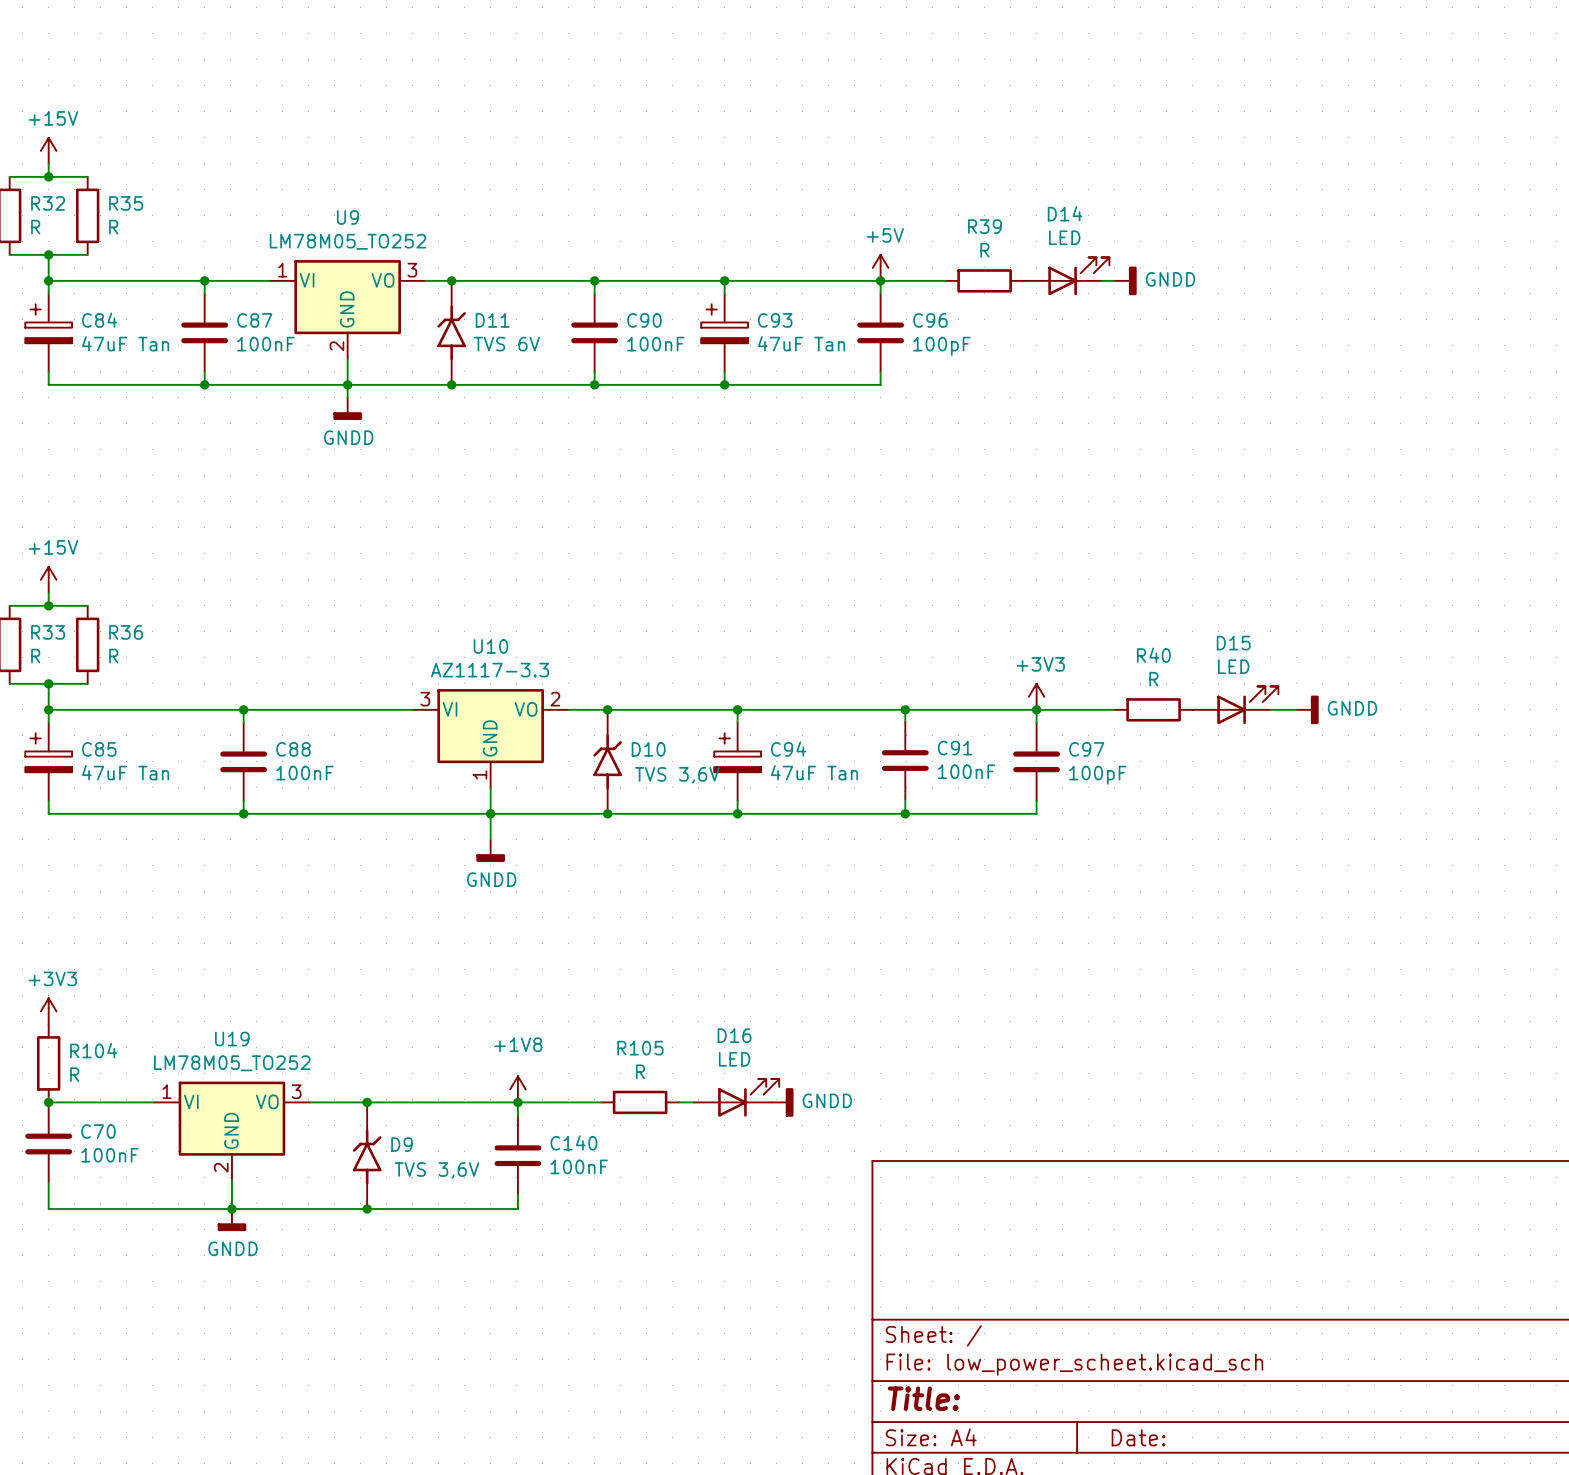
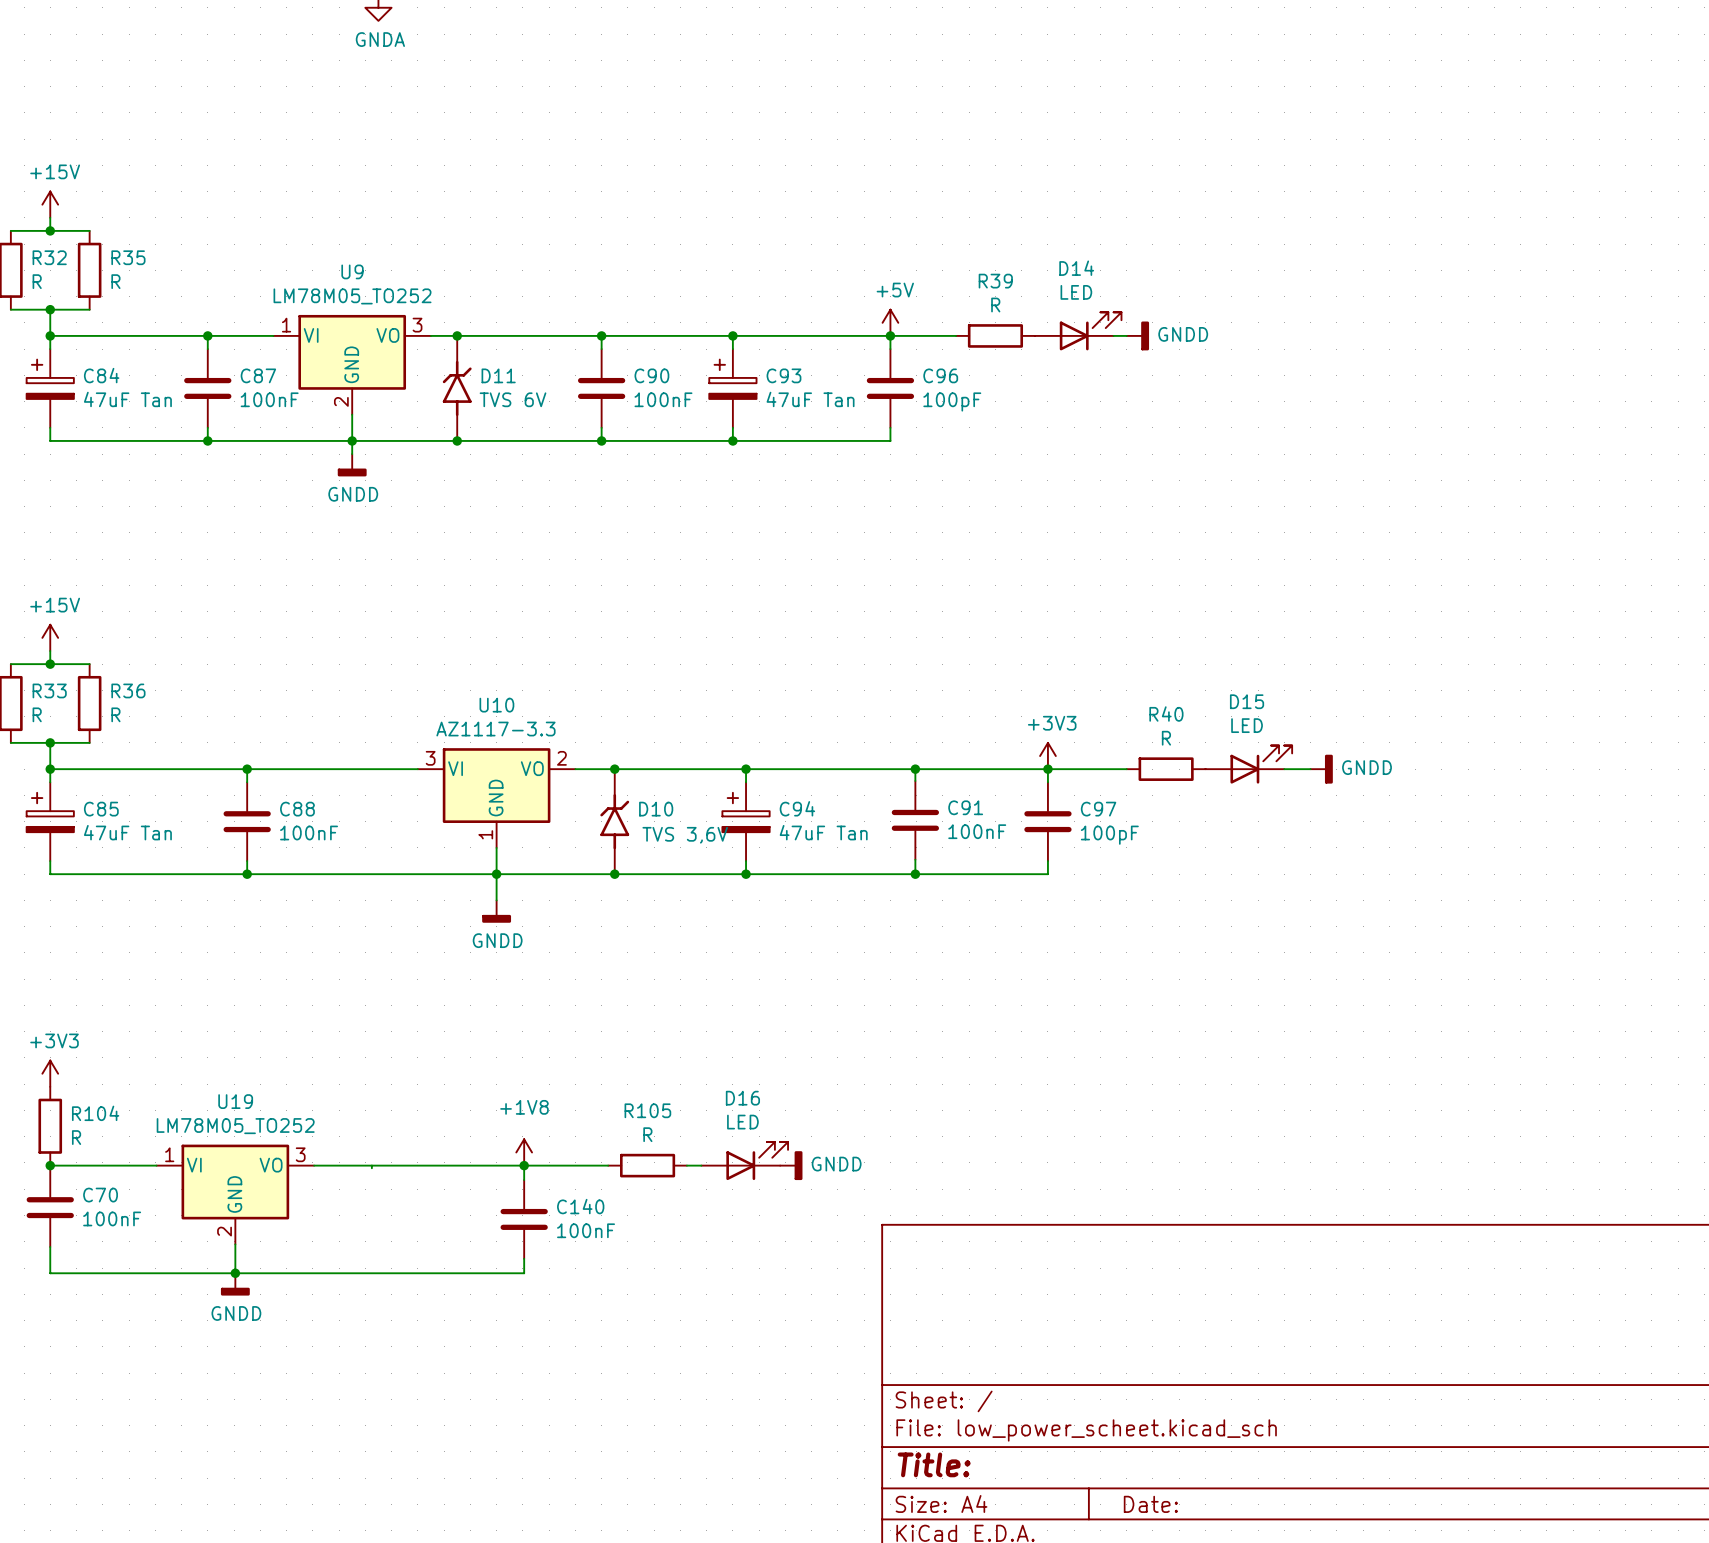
junction: (367, 1102) -> none
D9: TVS 3,6V (367, 1157) -> none
junction: (367, 1209) -> none

